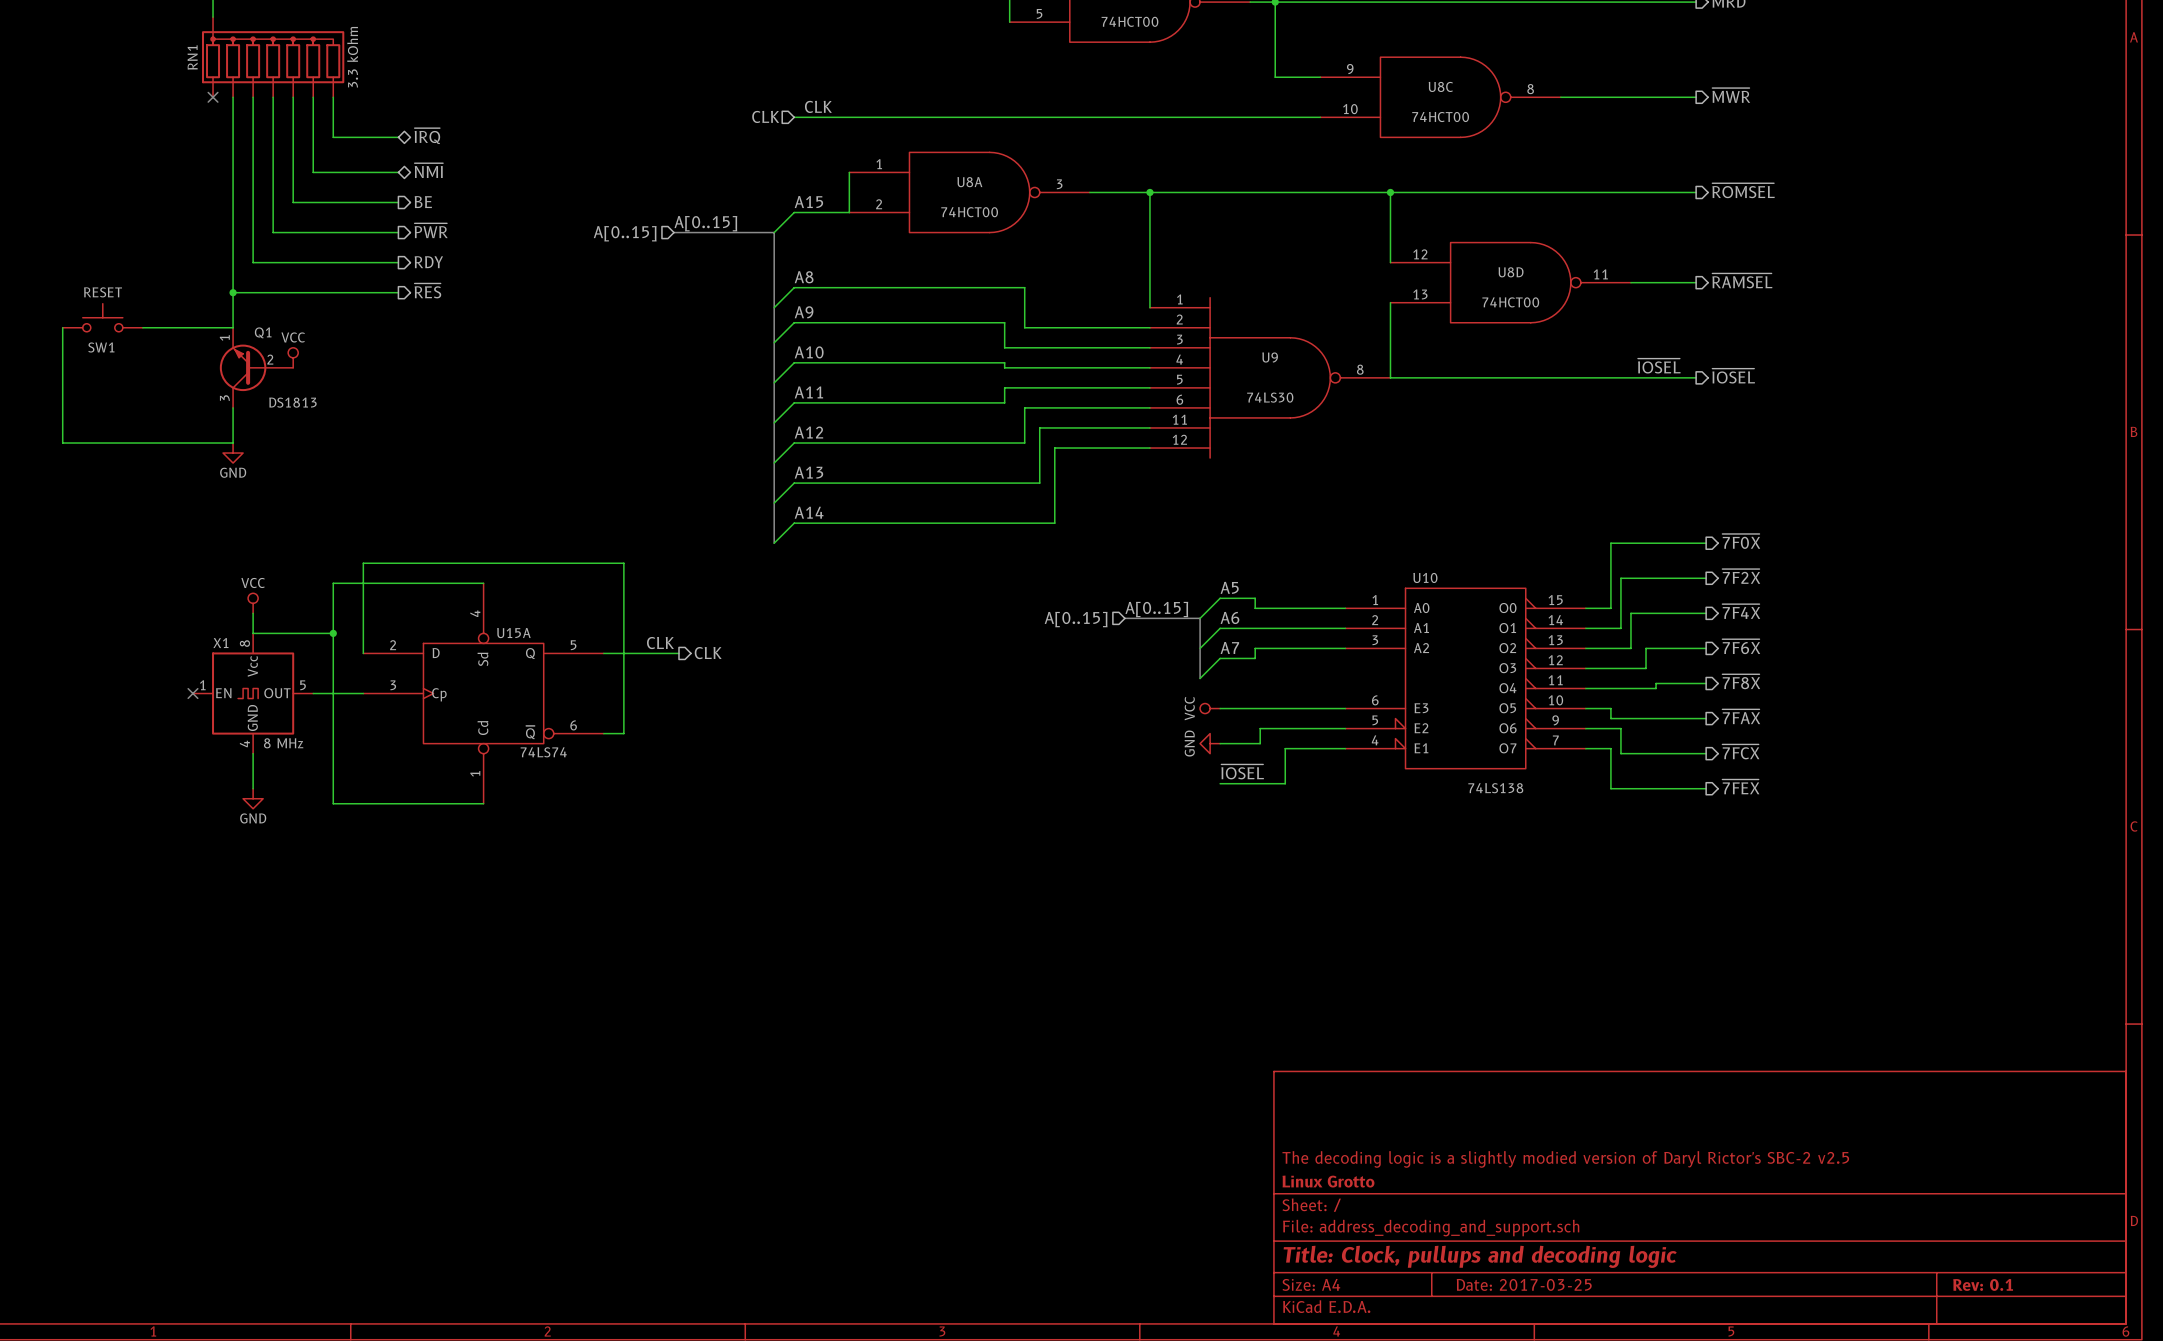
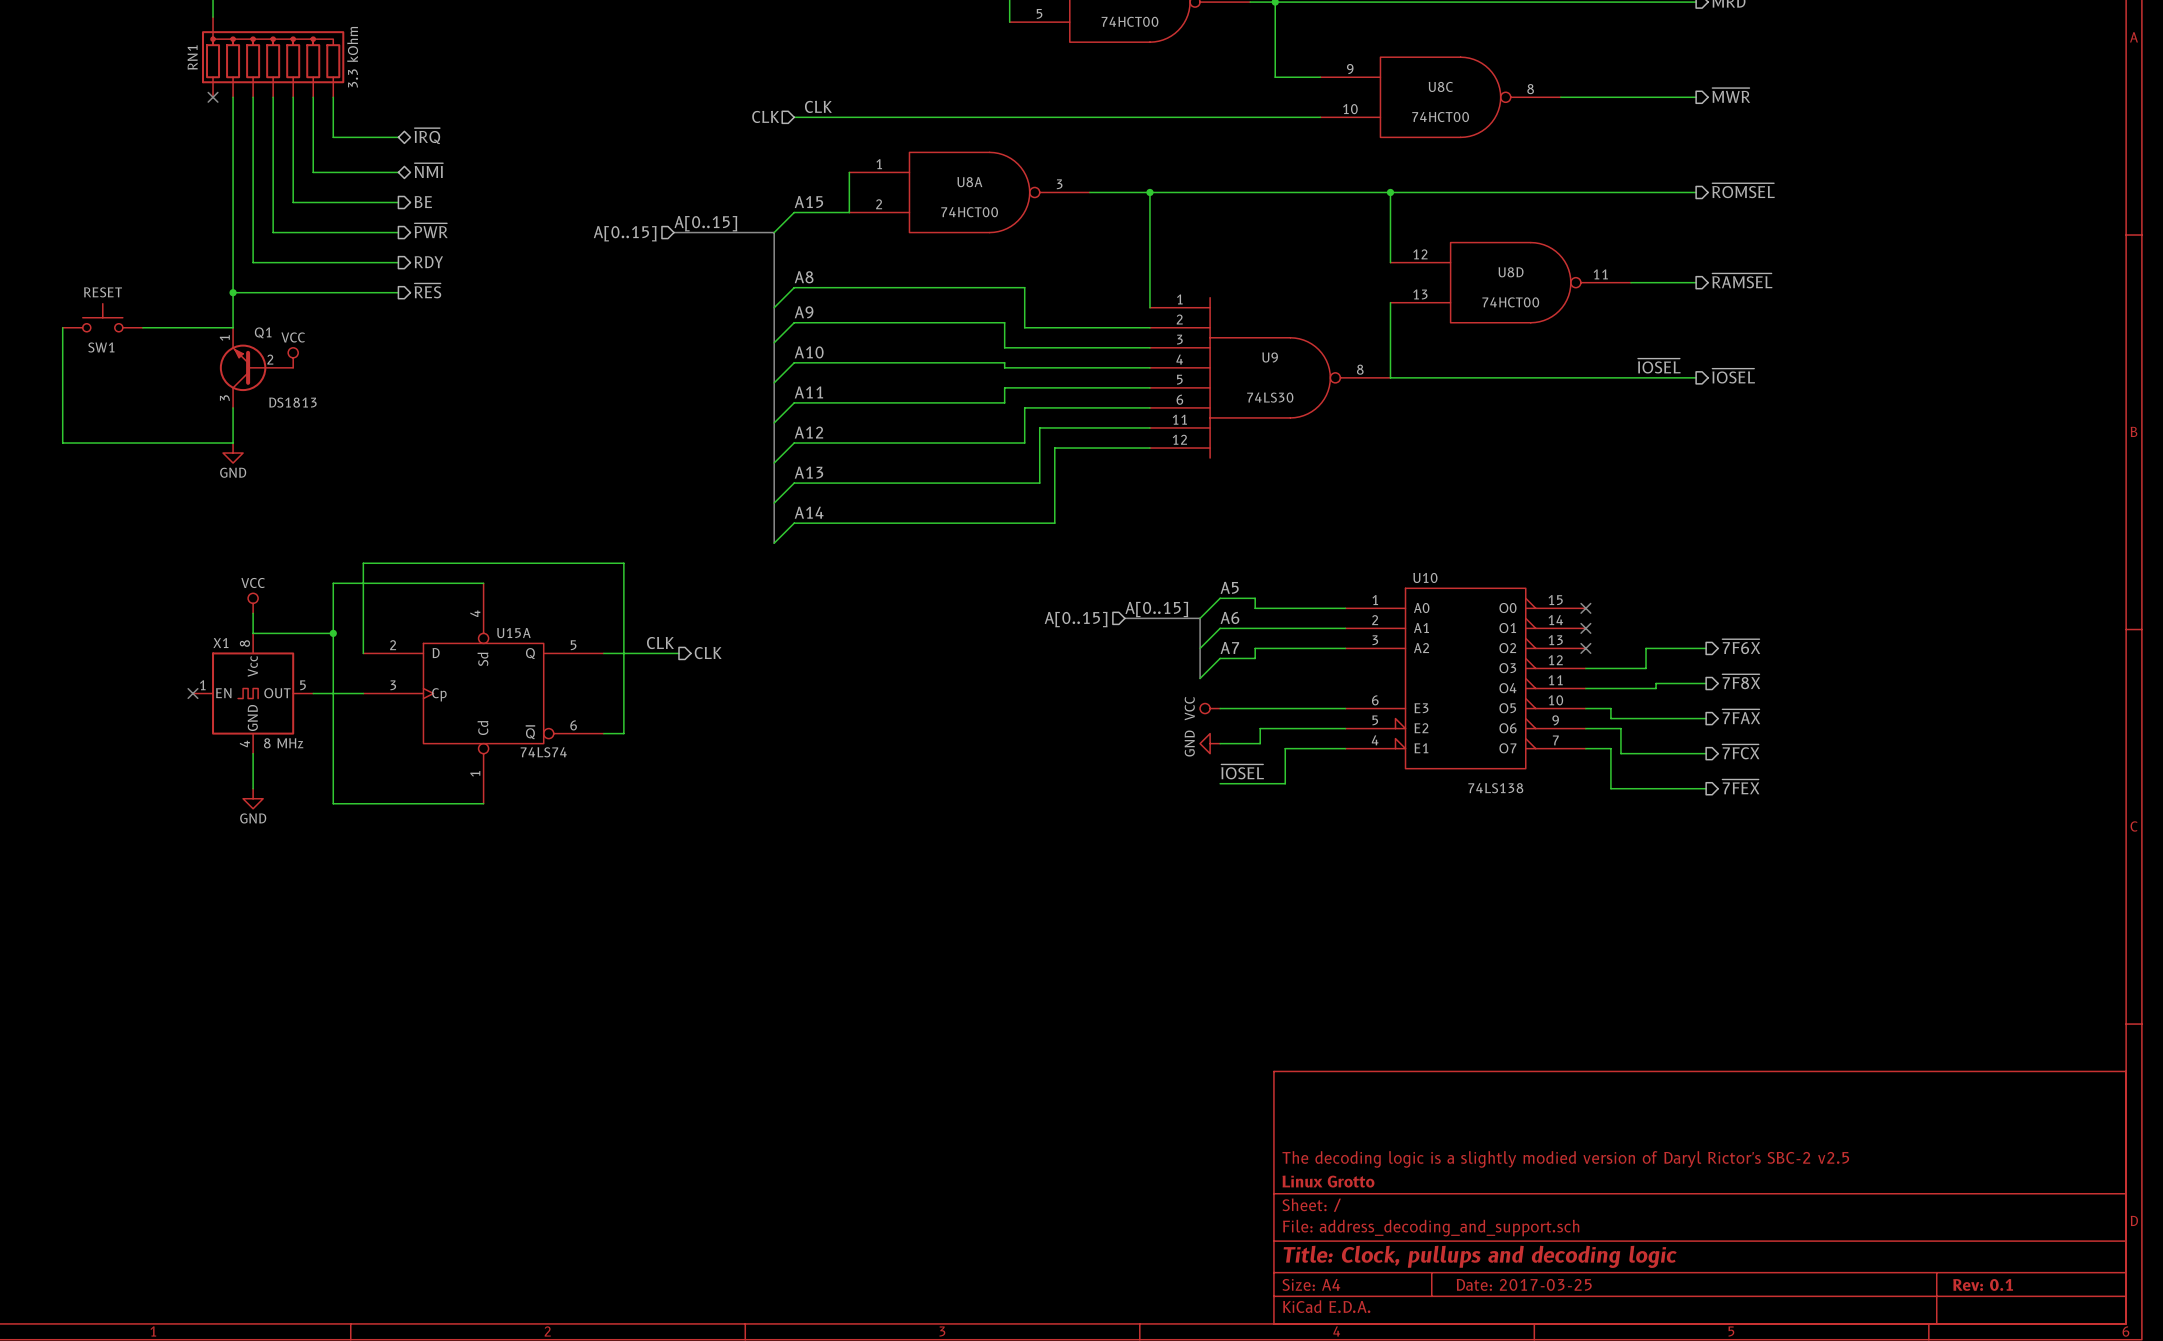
hierarchical label: ~{7F0X} (1741, 541) -> none
wire: (1706, 543) (1610, 543) (1610, 608) (1585, 608) -> none
hierarchical label: ~{7F2X} (1741, 576) -> none
wire: (1706, 578) (1620, 578) (1620, 628) (1585, 628) -> none
no-connect mark: none -> (1585, 608)
hierarchical label: ~{7F4X} (1741, 611) -> none
wire: (1706, 613) (1630, 613) (1630, 648) (1585, 648) -> none
no-connect mark: none -> (1585, 628)
no-connect mark: none -> (1585, 648)

